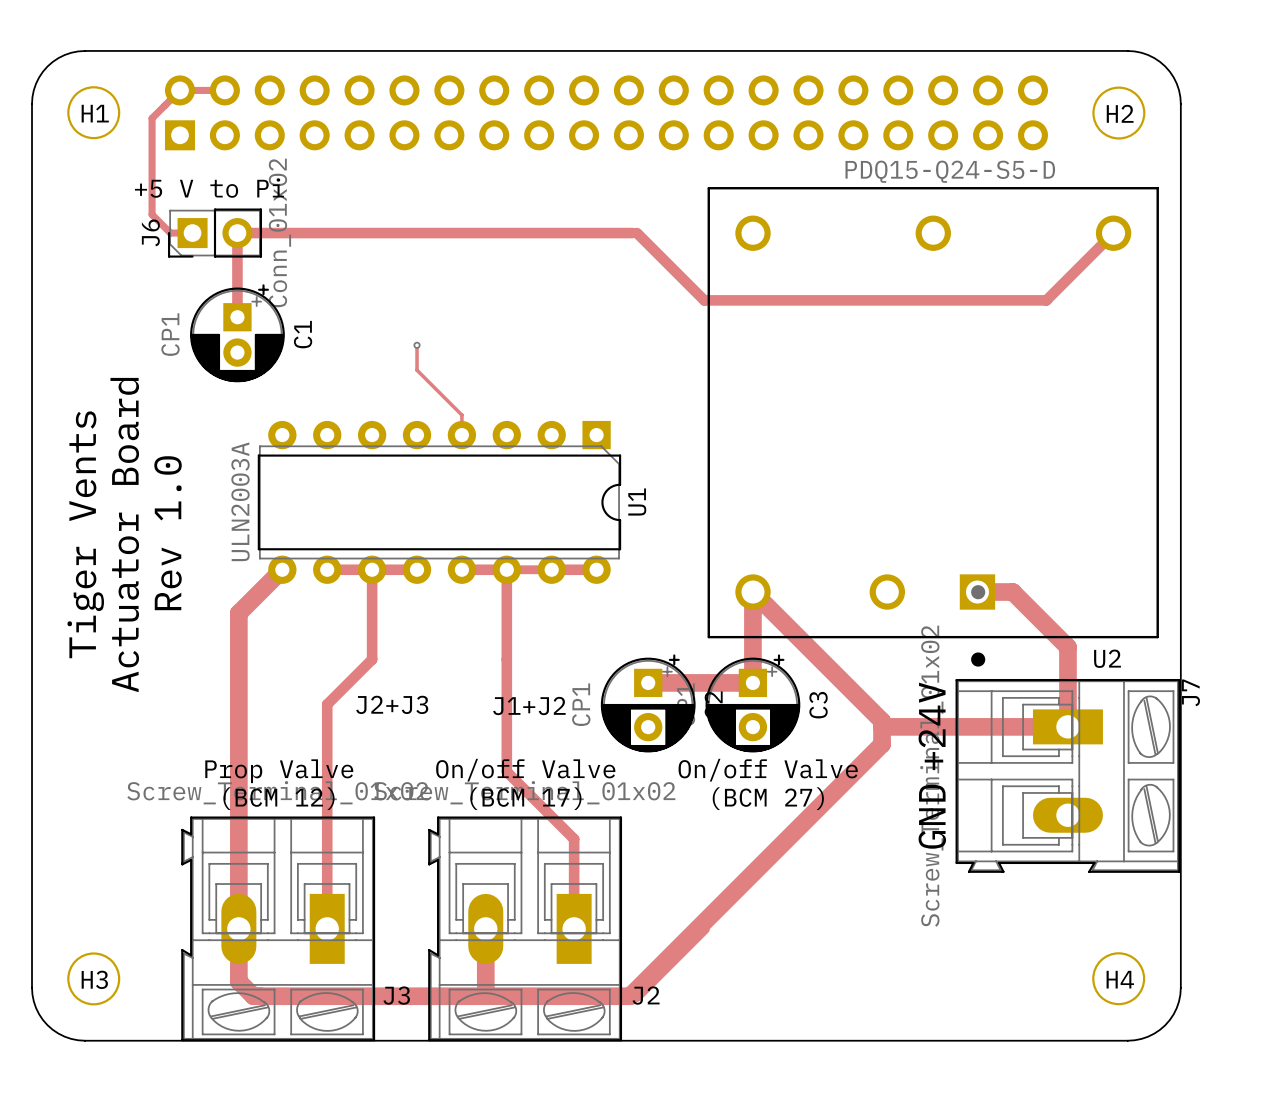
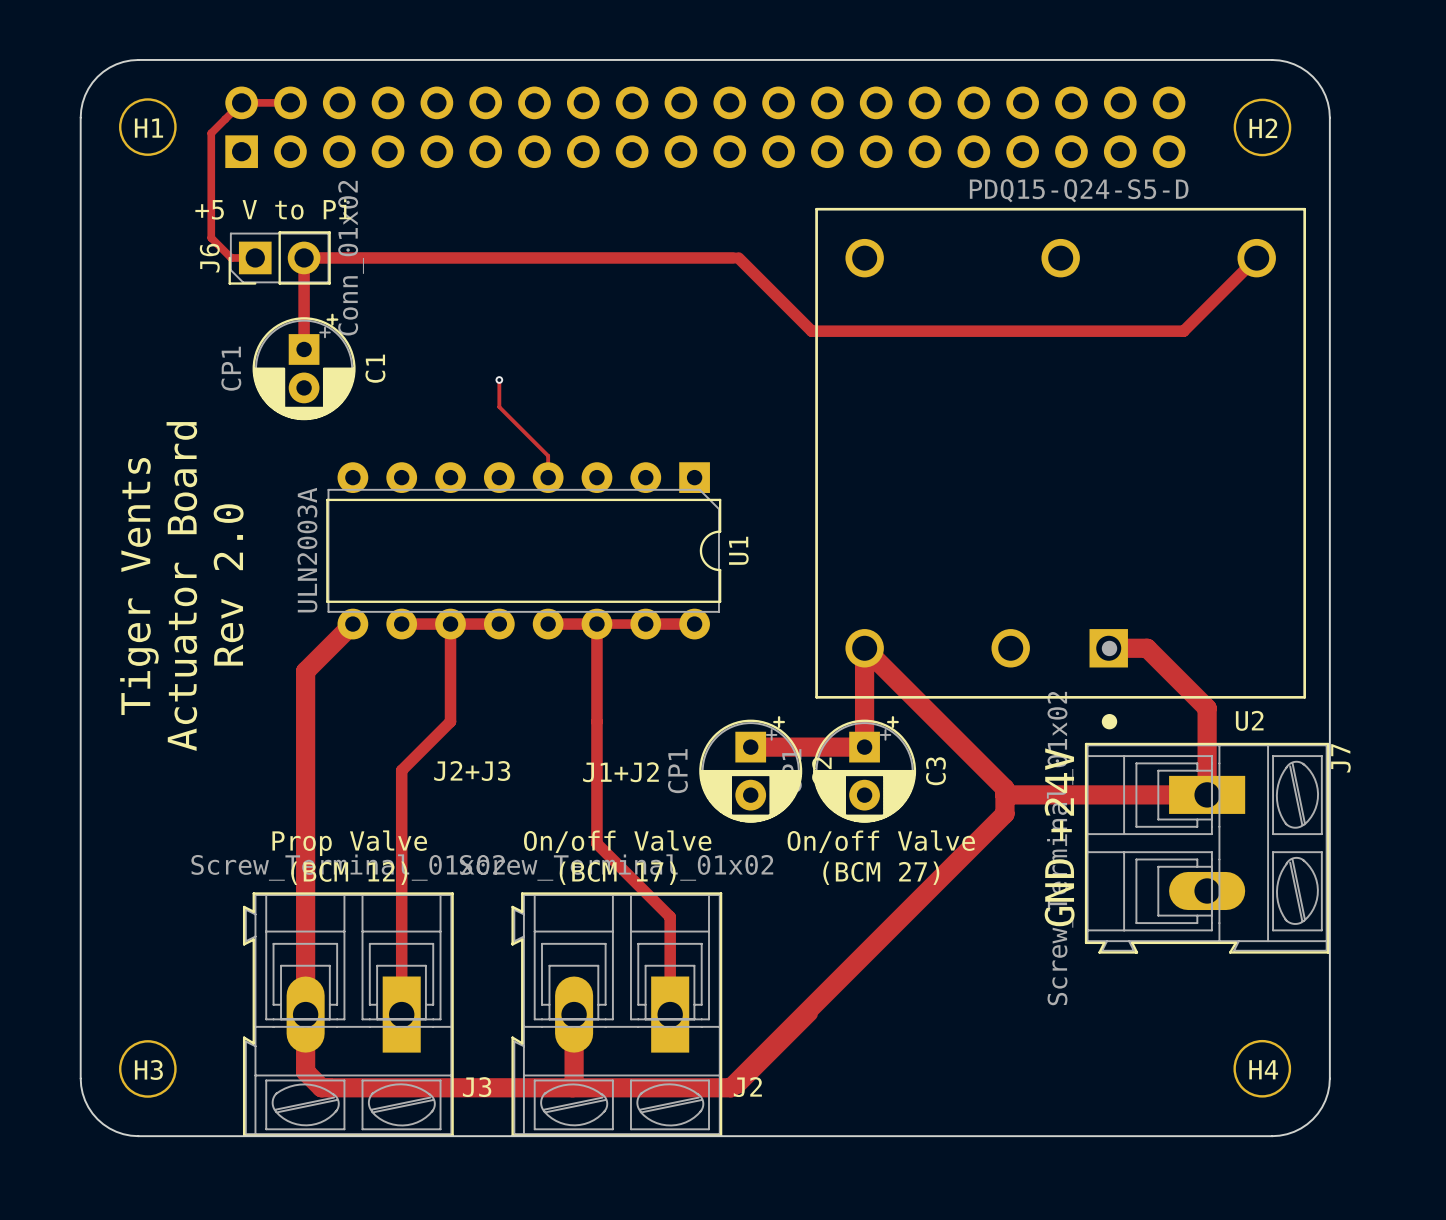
text: Rev 1.0 (168, 533) -> Rev 2.0 (228, 584)

